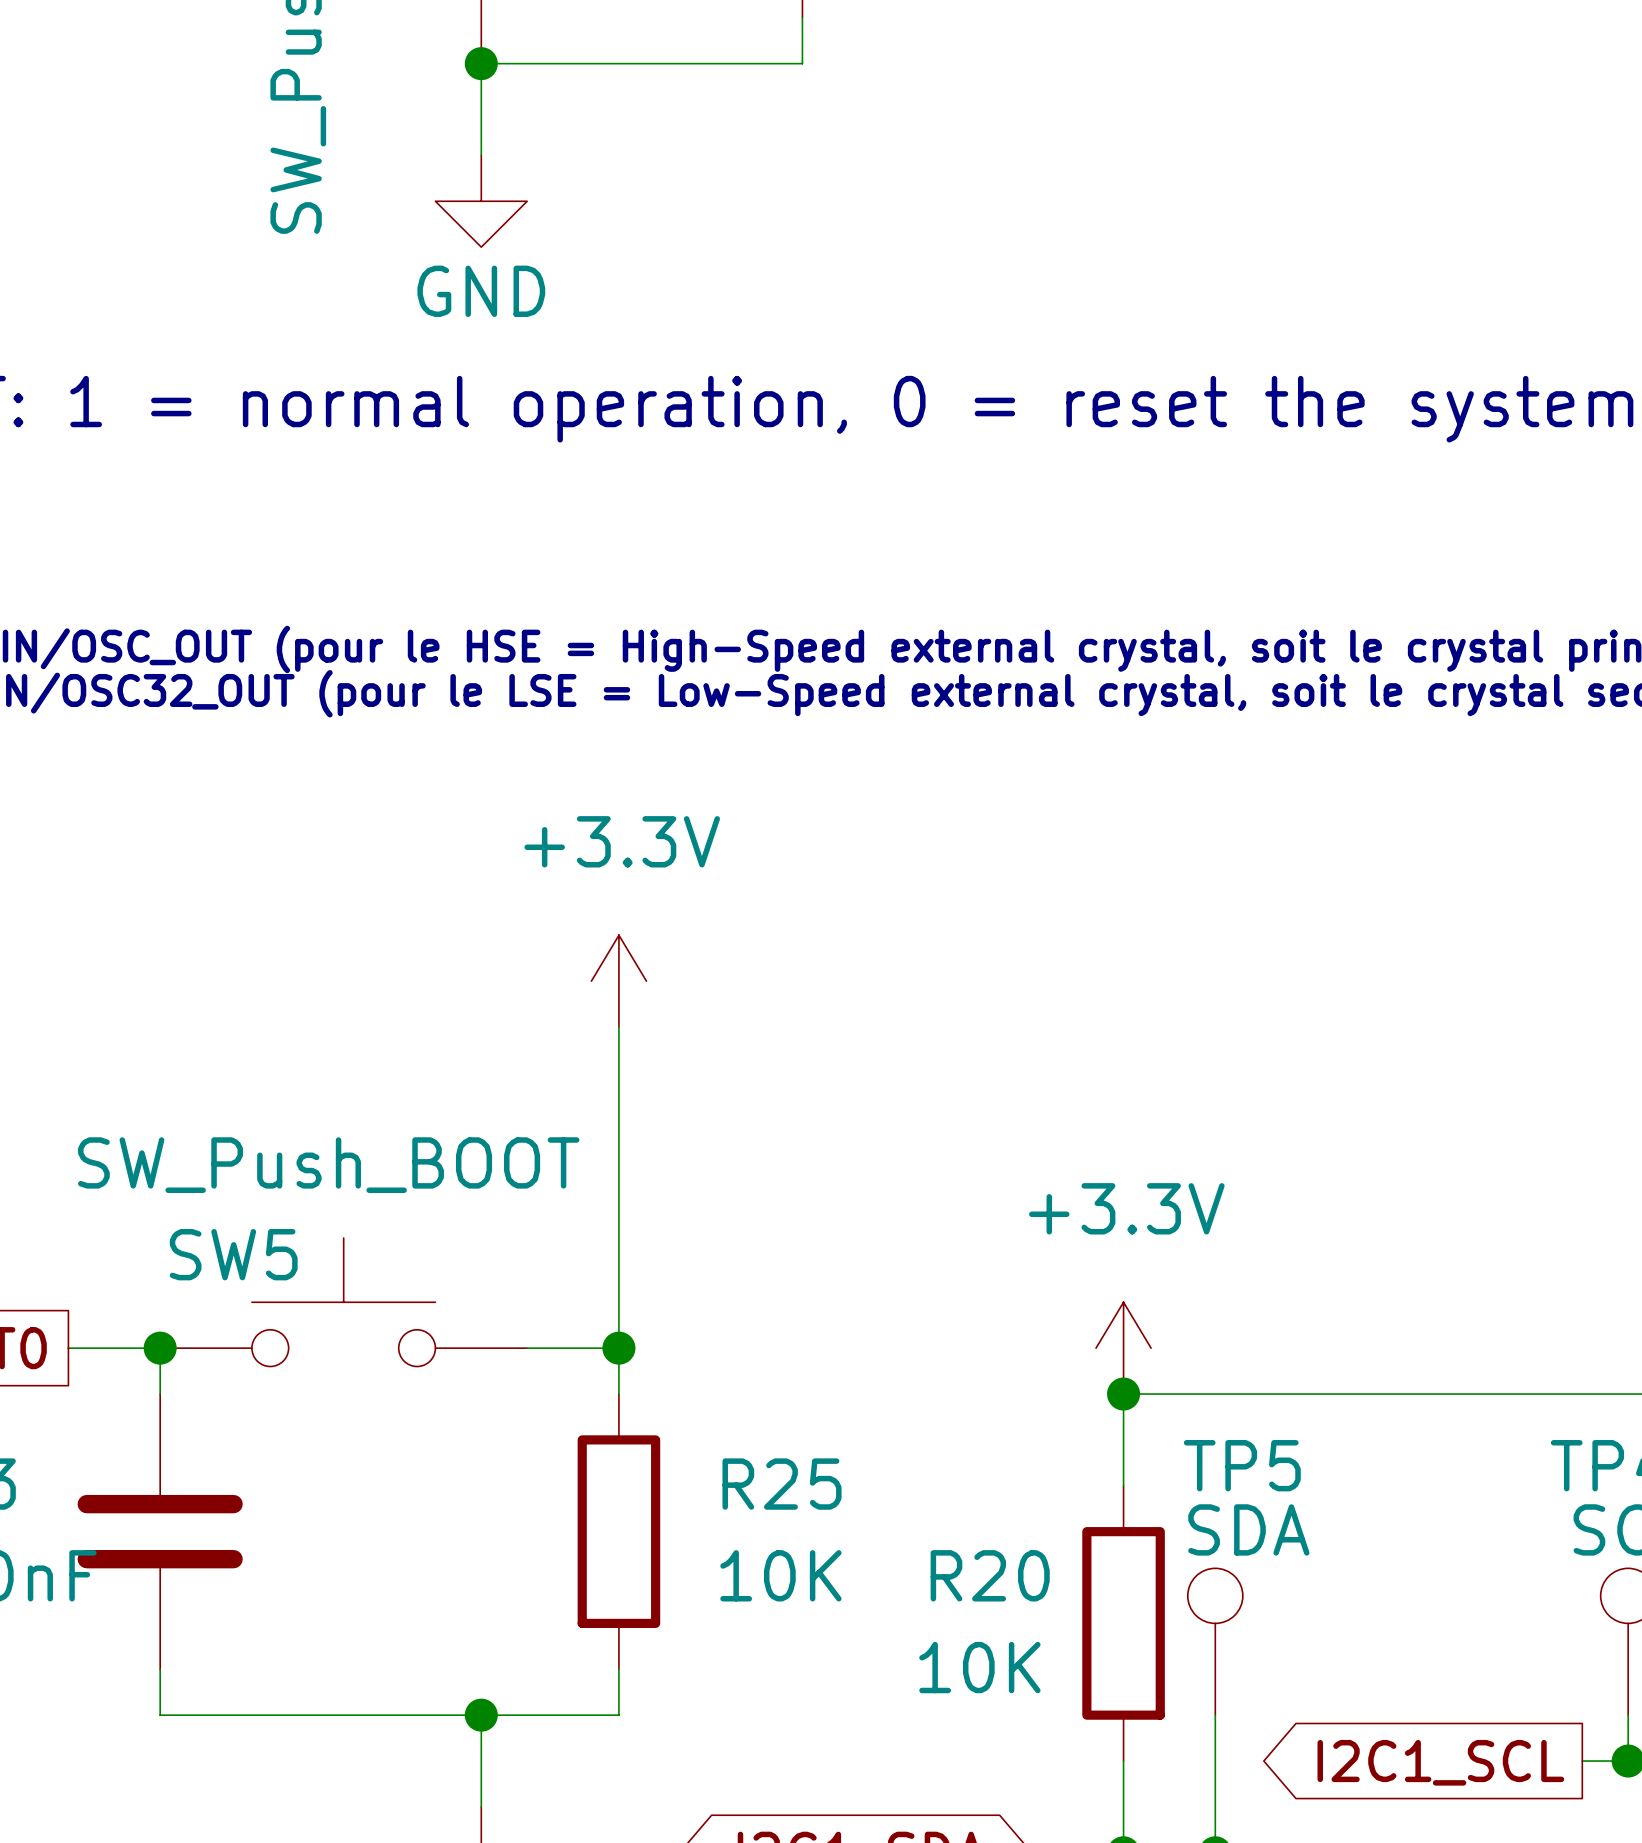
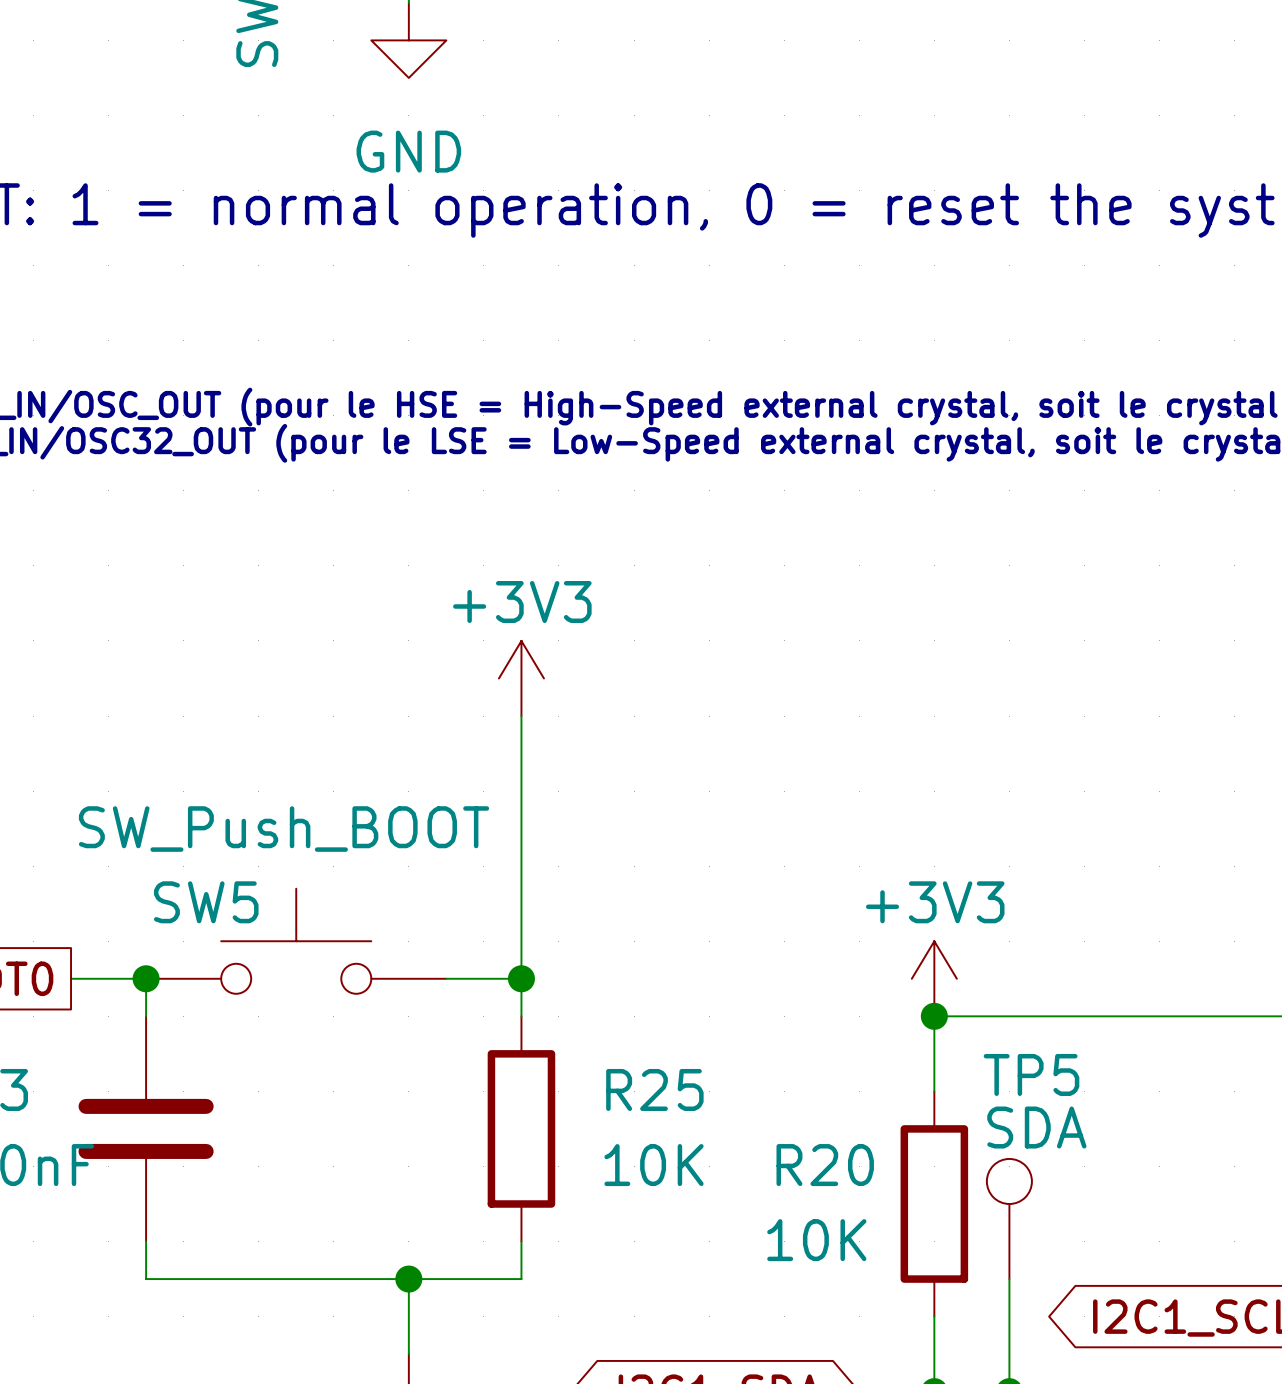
power symbol text position: GND (481, 291) -> GND (408, 151)
power symbol: +3.3V (618, 981) -> +3V3 (521, 678)
power symbol: +3.3V (1123, 1348) -> +3V3 (934, 978)

